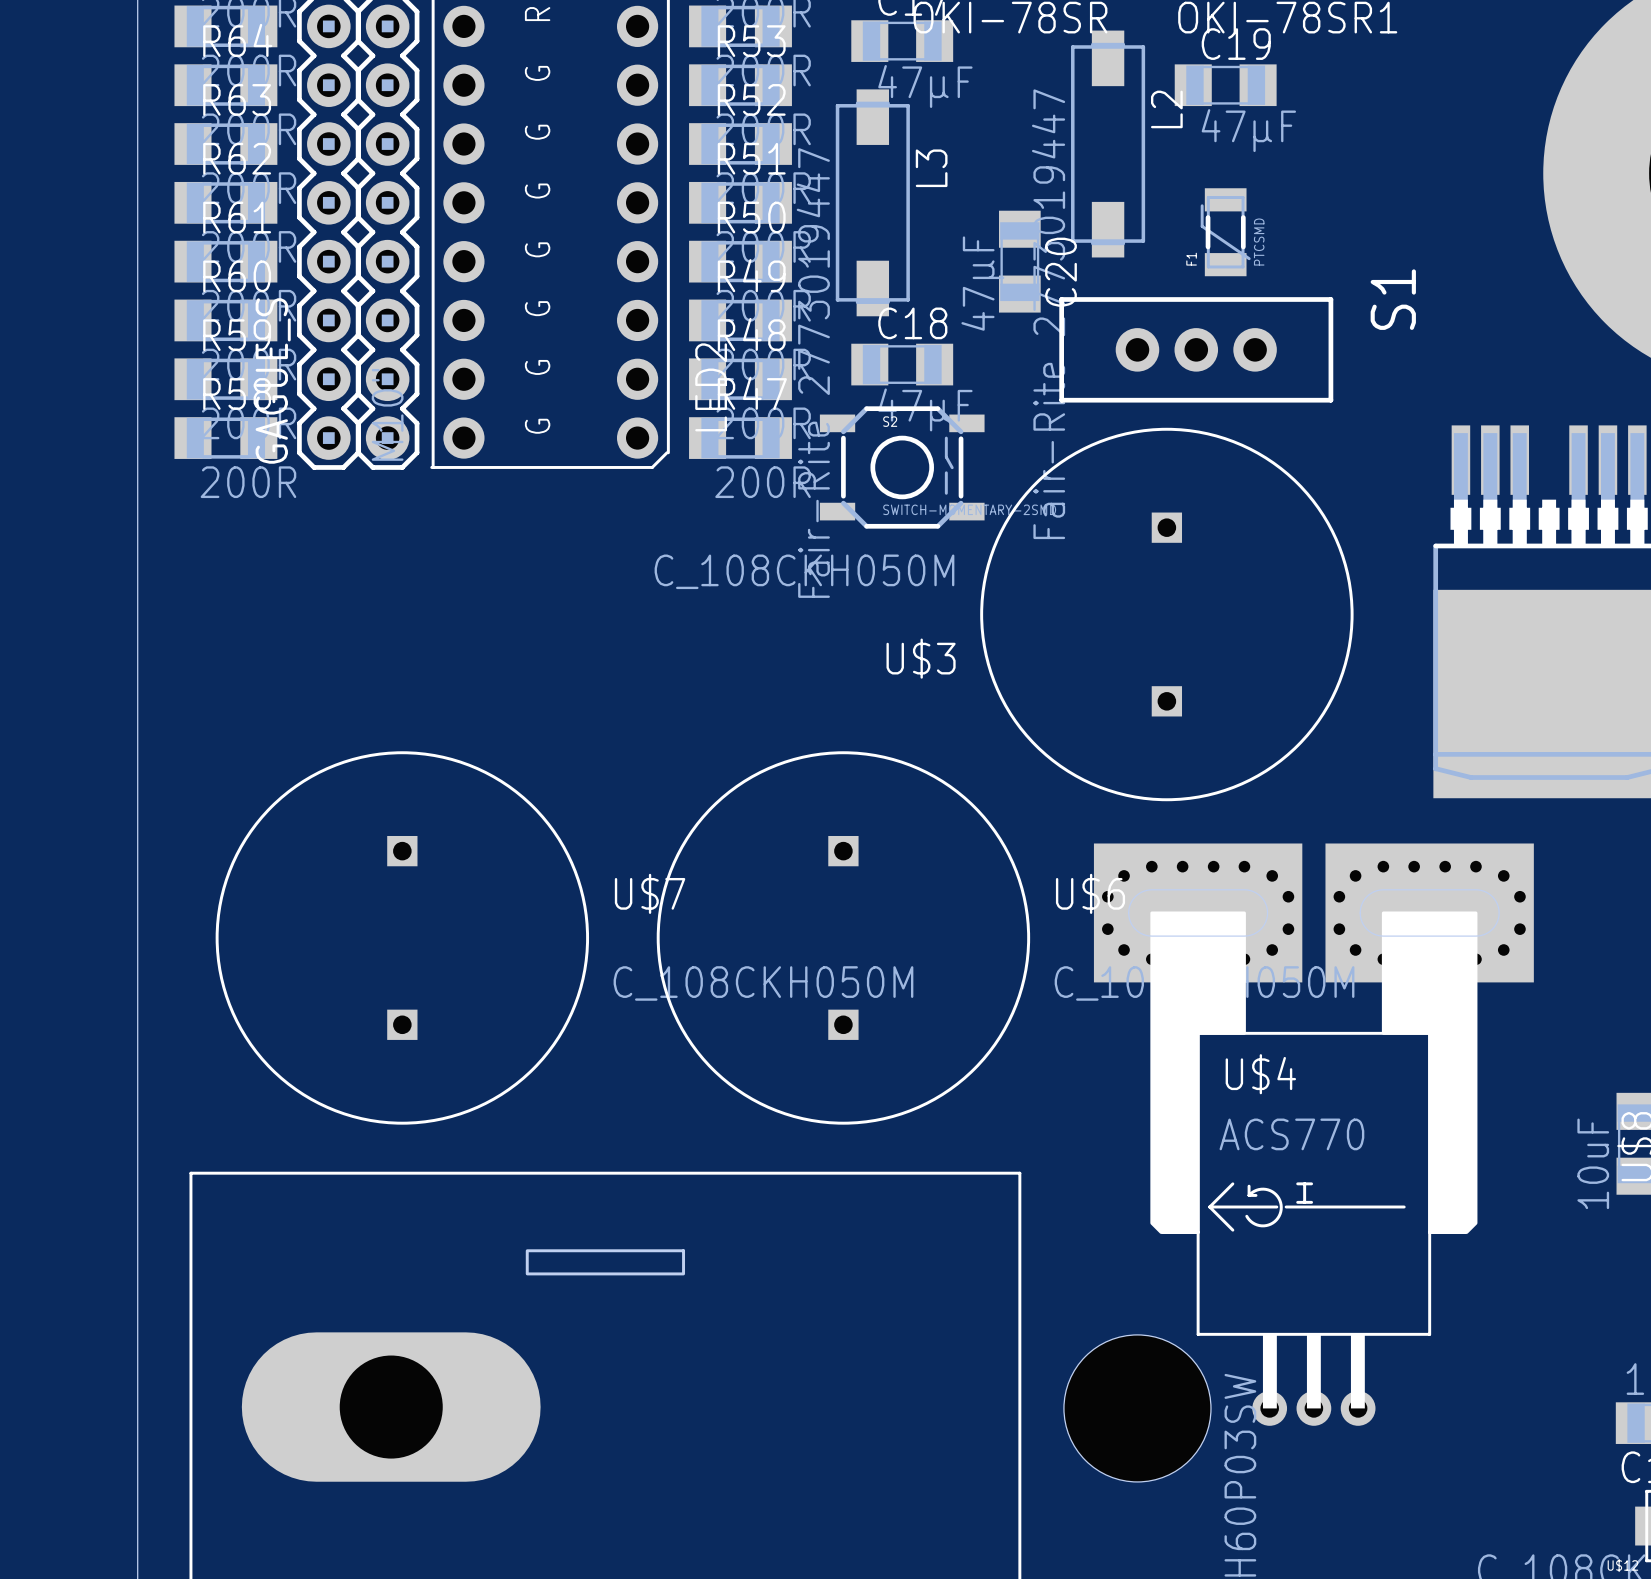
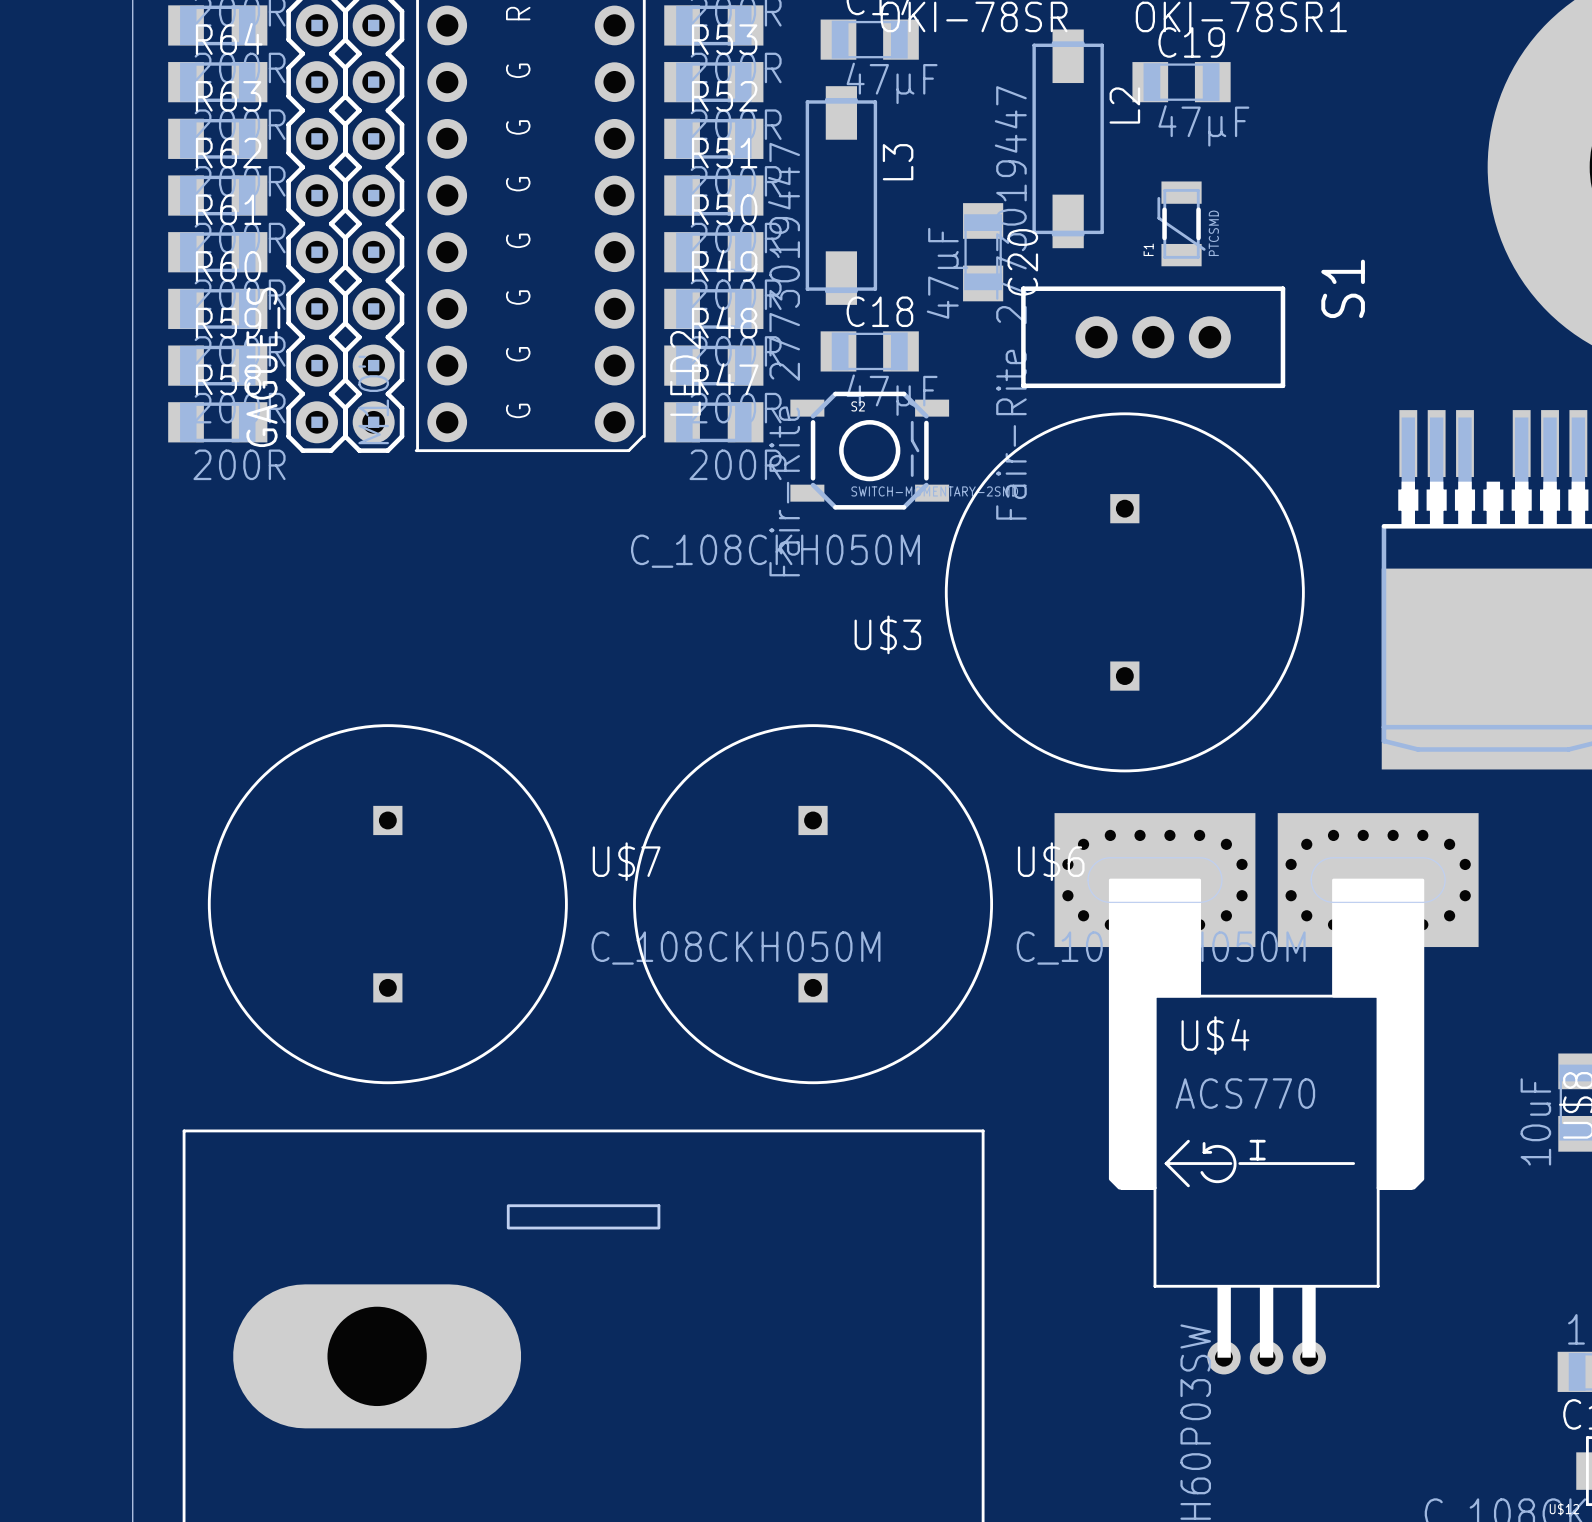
hole: (1137, 1408) -> none

